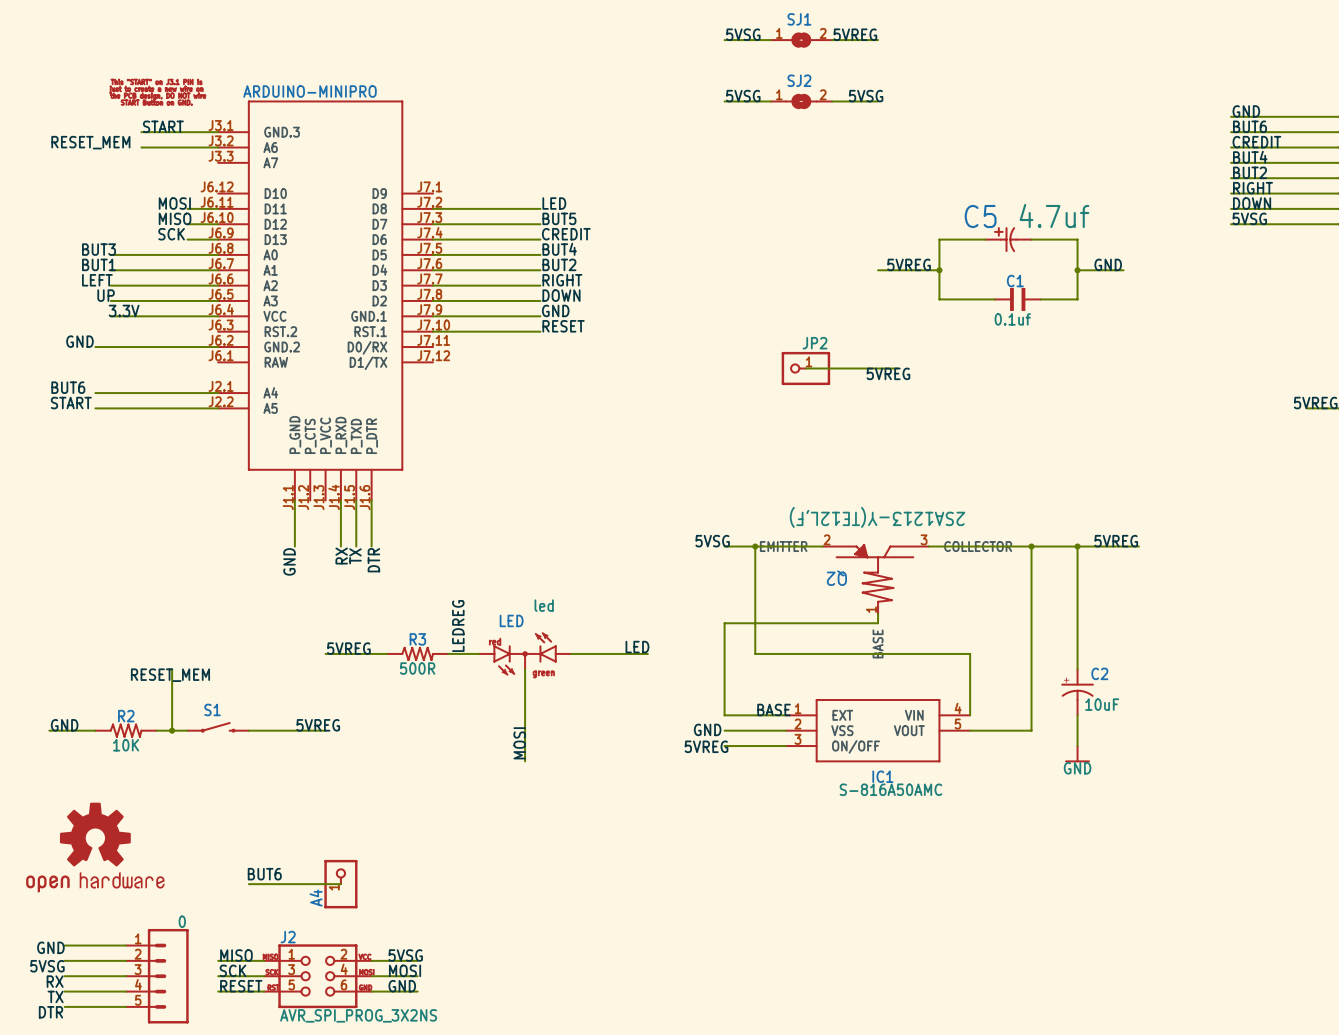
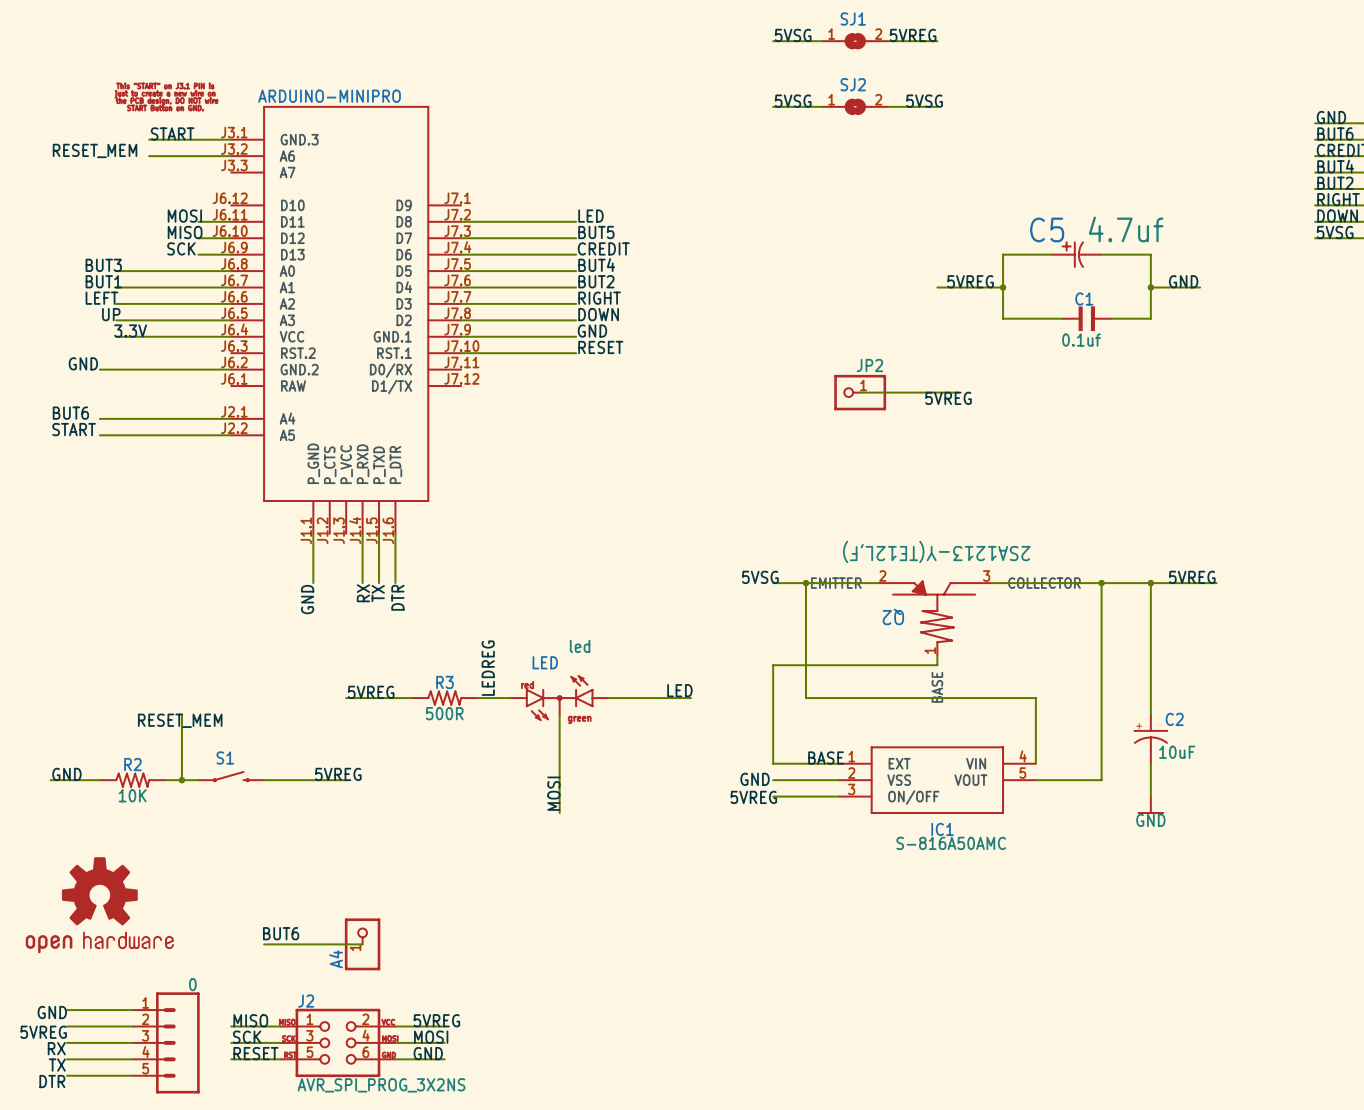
label: 5VSG (405, 955) -> 5VREG (436, 1020)
label: 5VSG (47, 966) -> 5VREG (43, 1032)

